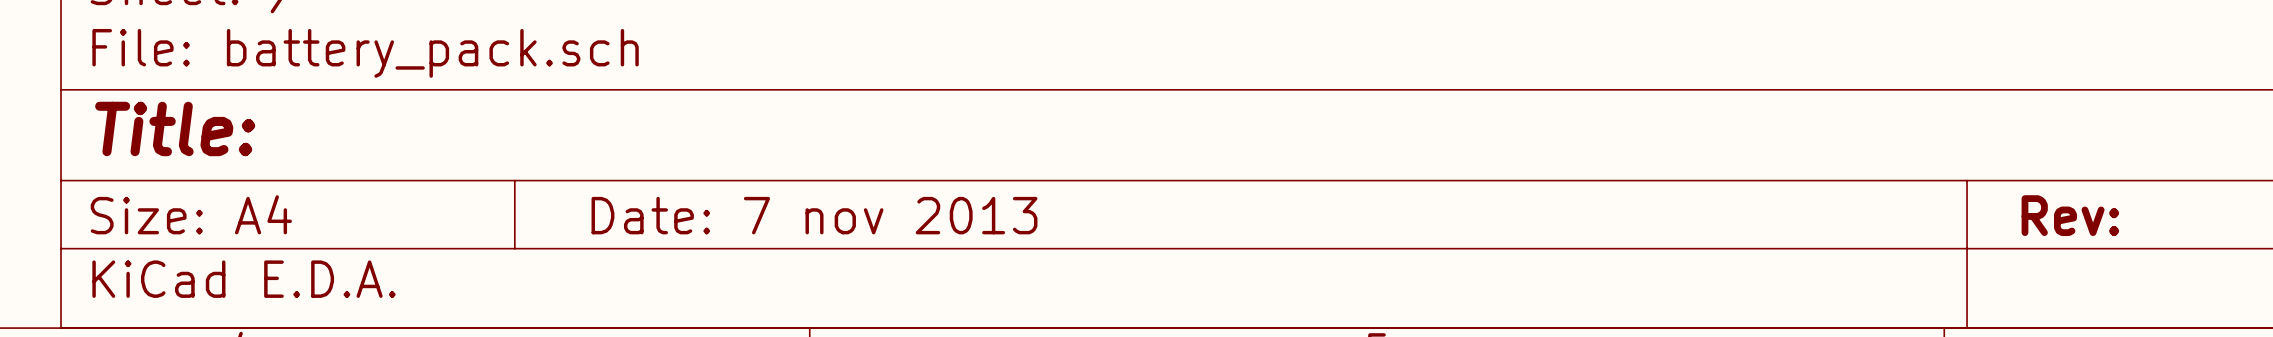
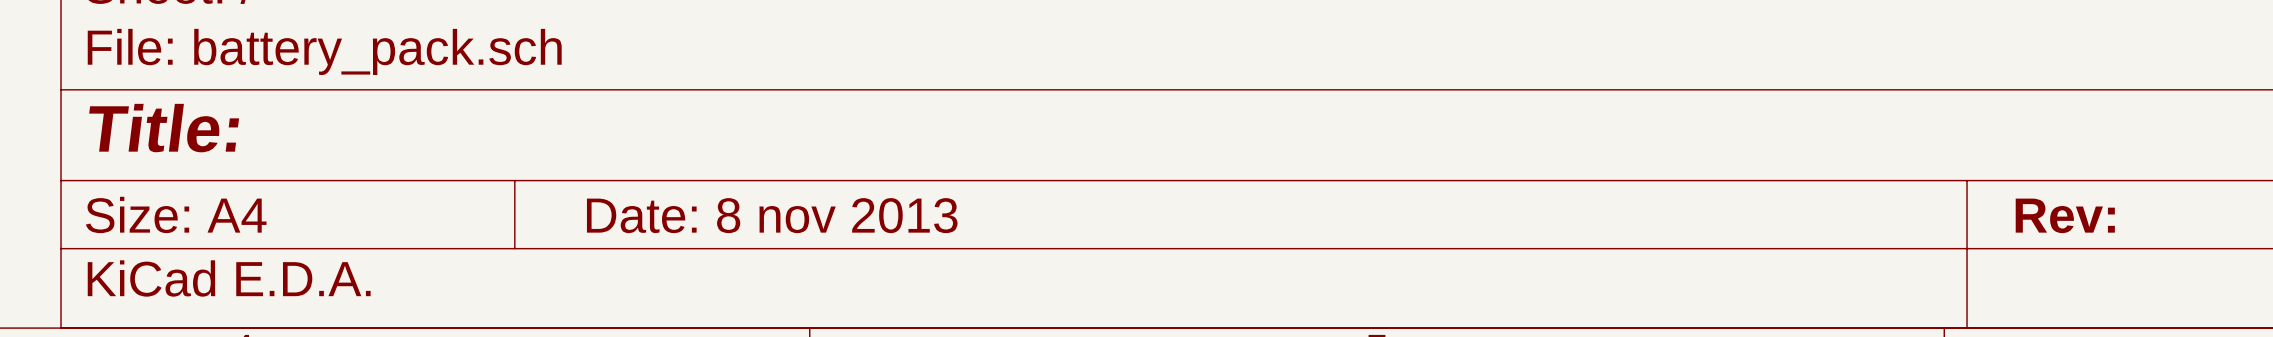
title block: Date: 7 nov 2013 (814, 215) -> Date: 8 nov 2013 (772, 215)

